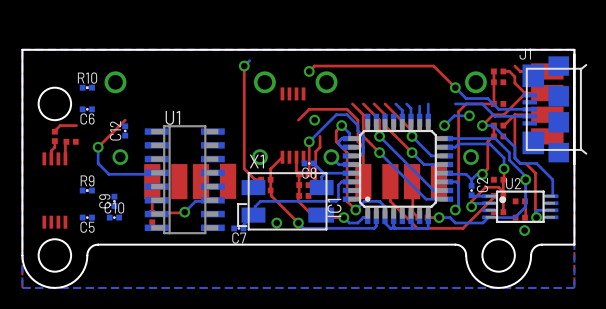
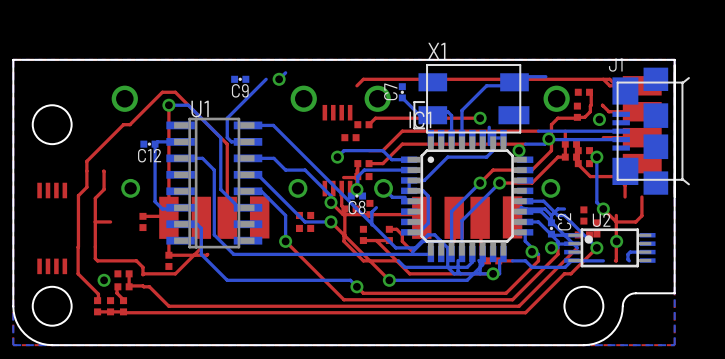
bottom track: none -> (545, 76) (520, 76) (511, 85) (486, 85) (461, 110) (461, 137)
bottom track: none -> (266, 79) (227, 118) (227, 137) (231, 141) (248, 141)
top track: (244, 66) (244, 168) (255, 179) (261, 179) -> none
top track: (433, 66) (455, 87) -> (506, 79) (609, 79) (616, 85)
via: (309, 71) -> none
top track: (493, 71) (493, 103) (466, 103) (458, 111) (458, 206) (455, 210) -> none
part: (498, 71) -> none
top track: (503, 71) (509, 71) (514, 76) (514, 83) (524, 93) -> (602, 105) (608, 111) (615, 111)
part: none -> (583, 92)
bottom track: none -> (402, 97) (419, 115) (432, 115) (436, 111) (447, 111) (451, 115) (451, 137)
part: (498, 82) -> none
R10 side: bottom (87, 87) -> top (123, 306)
bottom track: none -> (168, 105) (188, 105) (220, 137) (220, 189) (239, 207) (248, 207)
top track: none -> (168, 105) (168, 217) (142, 216)
via: none -> (168, 105)
bottom track: (455, 87) (466, 98) (487, 98) (498, 109) -> (538, 131) (583, 131)
via: (455, 87) -> none
part: none -> (577, 111)
top track: (525, 93) (504, 114) (493, 114) (482, 125) -> none
top track: none -> (480, 118) (375, 118) (369, 124)
via: none -> (480, 118)
via: none -> (599, 119)
part: none -> (363, 124)
top track: (352, 103) (363, 114) (363, 136) (379, 152) -> none
top track: (363, 103) (379, 120) (379, 136) -> none
top track: (374, 103) (385, 114) (385, 125) (412, 152) -> (589, 92) (591, 94) (590, 111) (584, 117) (557, 118) (551, 124) (551, 150) (532, 170) (493, 170) (480, 183)
top track: (385, 103) (412, 130) (412, 136) -> none
bottom track: (395, 103) (402, 110) (402, 120) -> none
bottom track: (406, 103) (410, 108) (410, 120) -> none
bottom track: (428, 103) (428, 120) -> none
bottom track: (455, 103) (482, 103) (494, 116) -> (525, 144) (544, 144) (549, 139) (579, 139)
part: (498, 103) -> none
bottom track: none -> (248, 125) (273, 125) (395, 247) (415, 247) (428, 234) (434, 234) (441, 241) (441, 254)
C6 side: bottom (87, 109) -> top (110, 306)
top track: none -> (538, 131) (402, 131) (382, 150) (369, 150)
top track: none -> (565, 131) (565, 157) (557, 157) (532, 183) (499, 183)
part: none -> (350, 137)
bottom track: none -> (503, 137) (493, 137) (493, 150) (486, 157) (447, 157) (424, 180) (409, 180) (409, 190) (423, 190) (428, 196) (428, 223) (419, 232) (409, 232)
bottom track: (469, 115) (454, 115) (444, 125) -> none
top track: (125, 120) (98, 147) -> none
top track: (298, 120) (309, 109) (347, 109) (357, 120) (357, 141) (363, 147) (363, 181) -> (331, 202) (343, 214) (418, 214) (421, 217)
via: (314, 120) -> none
top track: none -> (525, 144) (402, 144) (395, 150)
part: none -> (570, 144)
top track: (76, 125) (60, 125) (54, 131) -> none
bottom track: (341, 125) (349, 133) (349, 138) (341, 138) (339, 144) (341, 147) (349, 147) -> none
via: (341, 125) -> none
bottom track: (482, 125) (493, 125) (514, 147) (514, 158) (520, 163) (536, 163) (552, 179) (551, 196) -> none
via: (482, 125) -> none
top track: (493, 125) (493, 136) (487, 141) (487, 168) (482, 174) -> none
top track: (503, 125) (514, 114) (514, 158) (520, 163) (525, 163) (535, 173) (536, 217) -> none
C12 rotation: 0° (125, 130) -> 90° clockwise (149, 144)
C12 position: (125, 130) -> (149, 144)
bottom track: none -> (337, 157) (343, 150) (382, 150) (391, 159) (409, 159)
via: none -> (337, 157)
top track: (336, 130) (336, 141) (347, 152) (347, 195) -> (389, 229) (396, 229) (402, 234)
top track: none -> (389, 157) (382, 163) (369, 163)
part: none -> (570, 157)
top track: none -> (576, 157) (577, 163) (590, 176) (616, 176) (625, 185) (625, 197)
via: none -> (596, 157)
bottom track: none -> (180, 158) (202, 158) (214, 170) (214, 234) (233, 254) (430, 254)
bottom track: none -> (248, 158) (273, 158) (285, 170) (305, 170) (331, 196) (331, 202)
part: (54, 136) -> none
top track: none -> (357, 163) (356, 177) (343, 177)
part: none -> (363, 163)
top track: (320, 136) (320, 147) (315, 151) (315, 178) (308, 185) -> none
bottom track: (379, 136) (433, 190) (446, 190) -> none
via: (379, 136) -> none
bottom track: (412, 136) (431, 155) (446, 155) -> none
via: (412, 136) -> none
bottom track: (446, 138) (495, 138) (509, 152) -> (596, 157) (596, 183)
top track: (54, 141) (51, 158) -> none
top track: (66, 141) (65, 158) -> none
part: (71, 141) -> none
bottom track: (309, 141) (336, 114) (347, 114) (357, 125) (357, 130) (363, 136) (363, 152) (360, 155) (349, 155) -> none
via: (309, 141) -> none
bottom track: none -> (409, 170) (364, 170) (357, 176) (356, 189)
top track: none -> (103, 171) (104, 189) (95, 198) (95, 258) (97, 260) (136, 260) (142, 267) (142, 274) (175, 273) (201, 247) (201, 217)
bottom track: none -> (248, 174) (257, 174) (305, 221) (331, 221)
bottom track: (98, 147) (98, 163) (108, 174) (146, 174) -> (180, 141) (157, 141) (155, 144) (155, 201) (162, 208)
via: (98, 147) -> none
part: none -> (363, 176)
bottom track: (446, 147) (455, 147) (458, 143) (489, 143) (504, 158) (504, 168) -> none
bottom track: (379, 152) (426, 199) (446, 199) -> none
via: (379, 152) -> none
bottom track: (412, 152) (423, 164) (446, 164) -> (480, 183) (451, 211) (451, 254)
bottom track: none -> (499, 183) (461, 220) (461, 254)
via: none -> (499, 183)
top track: (282, 157) (270, 169) (271, 195) (298, 222) -> none
top track: (309, 158) (308, 174) -> none
via: none -> (356, 189)
bottom track: none -> (248, 191) (261, 191) (285, 215) (285, 241)
bottom track: (509, 160) (525, 176) (525, 206) (514, 217) -> (596, 192) (596, 202) (603, 208)
bottom track: (313, 163) (323, 173) (349, 173) -> none
top track: none -> (641, 197) (641, 215) (635, 221) (616, 221) (603, 208)
bottom track: none -> (525, 201) (543, 201) (557, 215) (564, 215) (596, 247)
via: none -> (331, 202)
IC1 rotation: 0° (397, 168) -> 90° clockwise (467, 196)
top track: (504, 168) (503, 212) -> none
via: (504, 168) -> none
via: (482, 174) -> none
via: none -> (603, 208)
bottom track: none -> (525, 211) (541, 211) (577, 247)
U1 position: (184, 179) -> (214, 183)
part rotation: 0° (498, 179) -> 90° clockwise (583, 215)
via: (525, 179) -> none
top track: none -> (227, 217) (227, 144) (175, 92) (162, 92) (130, 124) (123, 124) (86, 161) (86, 187) (78, 195) (78, 273) (98, 294) (98, 300)
bottom track: (349, 181) (341, 181) (338, 185) (338, 199) (336, 201) (260, 201) (255, 206) (255, 213) (243, 225) (243, 228) -> none
bottom track: (446, 181) (456, 181) (458, 184) (458, 206) (455, 210) -> none
top track: none -> (110, 221) (95, 221)
part: none -> (142, 221)
top track: none -> (331, 221) (389, 280)
via: none -> (331, 221)
part: (303, 185) -> none
bottom track: none -> (525, 221) (538, 221) (557, 241) (557, 247)
bottom track: none -> (180, 224) (197, 224) (201, 228) (201, 254) (227, 280) (350, 280) (356, 286)
R9 side: bottom (87, 190) -> top (123, 286)
part: none -> (596, 228)
top track: (503, 191) (498, 187) (485, 187) (471, 201) (471, 206) -> none
bottom track: none -> (525, 232) (525, 241) (538, 254)
part: (303, 195) -> none
part: none -> (363, 234)
part: none -> (389, 234)
top track: (493, 195) (462, 228) (422, 228) -> none
bottom track: (212, 200) (195, 201) (184, 212) -> none
top track: none -> (389, 240) (363, 240)
C9 rotation: 0° (114, 201) -> 90° clockwise (240, 79)
C9 position: (114, 201) -> (240, 79)
top track: none -> (285, 241) (343, 299) (512, 299) (557, 254) (557, 247)
via: none -> (285, 241)
X1 position: (285, 201) -> (471, 98)
top track: (390, 201) (417, 228) -> (376, 240) (409, 273) (486, 273)
part: (520, 201) -> none
via: none -> (616, 241)
top track: none -> (577, 247) (519, 306) (168, 306) (149, 286) (129, 286) (129, 273)
top track: none -> (596, 247) (570, 273) (564, 273) (525, 312) (97, 311)
via: none -> (596, 247)
via: (355, 210) -> none
bottom track: none -> (482, 254) (482, 264) (467, 280) (389, 280)
via: (184, 212) -> none
top track: none -> (538, 254) (538, 260) (506, 293) (363, 293) (356, 286)
part: (498, 212) -> none
C5 side: bottom (87, 217) -> top (123, 273)
C10 side: bottom (114, 217) -> top (369, 208)
via: (343, 217) -> none
bottom track: (367, 217) (363, 217) (357, 222) -> (472, 254) (472, 262) (467, 267) (415, 267)
bottom track: (376, 217) (376, 226) (374, 228) (303, 228) (298, 222) -> none
via position: (439, 217) -> (493, 273)
part: (520, 217) -> none
via: (536, 217) -> none
via: (276, 222) -> none
via: (298, 222) -> none
C7 rotation: 0° (238, 228) -> 90° clockwise (402, 92)
C7 position: (238, 228) -> (402, 92)
via: (524, 230) -> none
via: none -> (104, 280)
via: none -> (389, 280)
top track: none -> (117, 286) (117, 293) (123, 300)
via: none -> (356, 286)
part: none -> (97, 306)
board edge: (531, 255) (528, 267) (521, 278) (511, 285) (498, 287) (486, 285) (475, 278) (468, 267) (464, 250) (456, 244) (96, 244) (88, 250) (84, 267) (77, 278) (67, 285) (54, 287) (42, 285) (31, 278) (24, 267) (22, 255) -> (622, 306) (619, 321) (611, 333) (598, 342) (583, 345) (47, 344) (32, 339) (21, 329) (14, 316) (13, 306)

